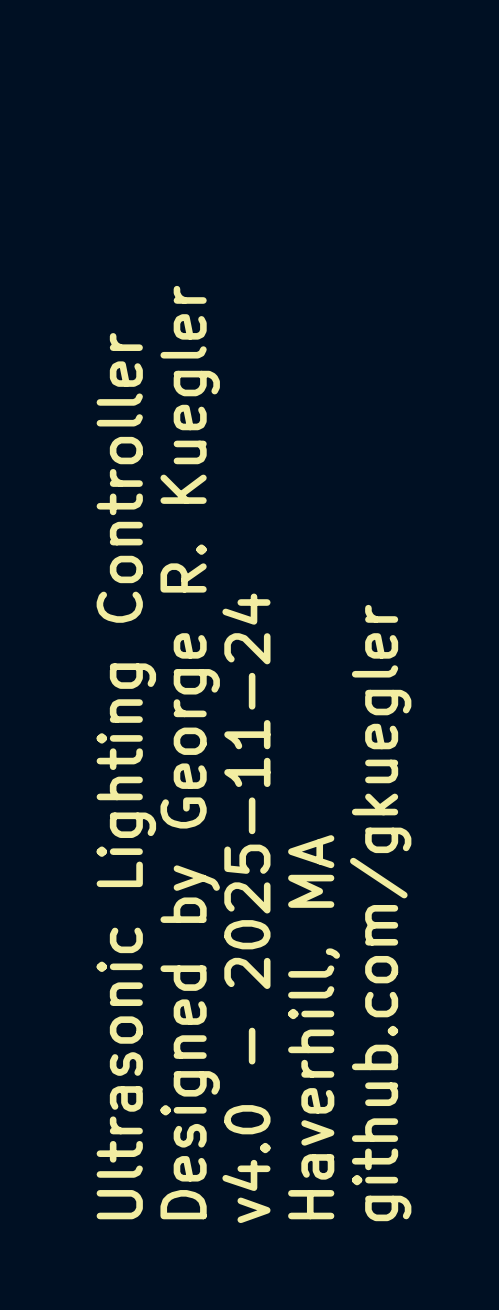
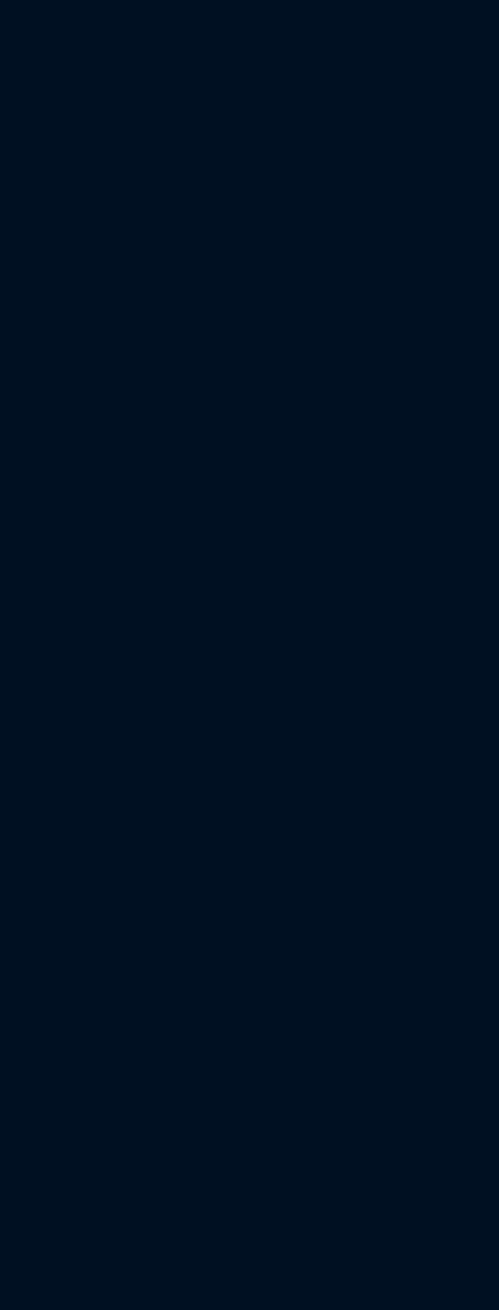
text: Designed by George R. Kuegler (190, 752) -> none
text: Ultrasonic Lighting Controller (126, 776) -> none
text: v4.0 - 2025-11-24 (246, 908) -> none
text: github.com/gkuegler (380, 913) -> none
text: Haverhill, MA (314, 1027) -> none

